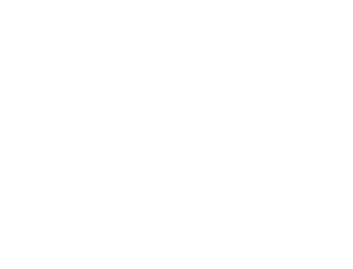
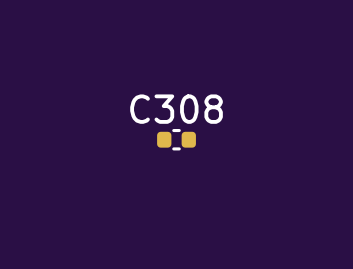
C308: none -> (176, 139)

